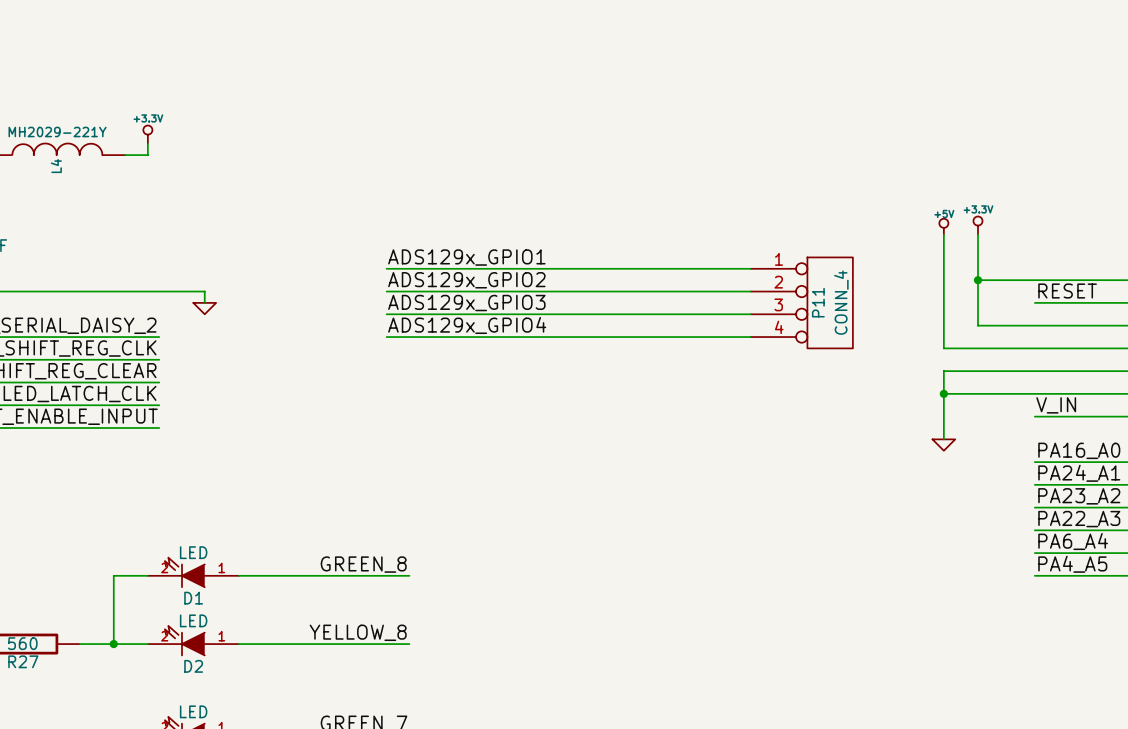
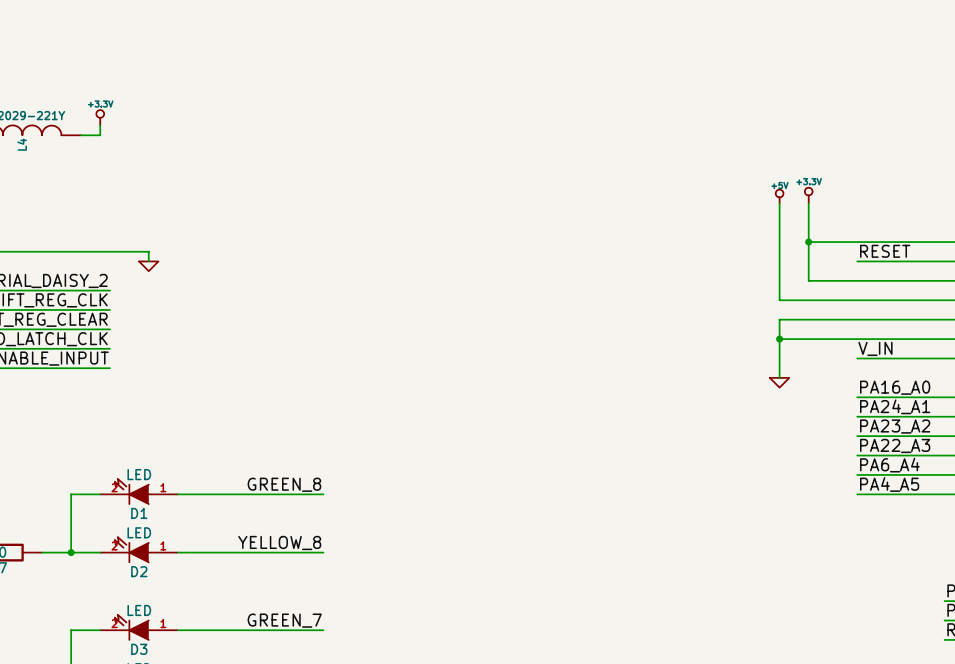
label: ADS129x_GPIO1 (466, 257) -> none
wire: (386, 268) (750, 268) -> none
label: ADS129x_GPIO2 (466, 280) -> none
wire: (386, 291) (750, 291) -> none
P11: CONN_4 (801, 302) -> none
label: ADS129x_GPIO3 (466, 303) -> none
wire: (386, 314) (750, 314) -> none
label: ADS129x_GPIO4 (467, 325) -> none
wire: (386, 337) (750, 337) -> none

